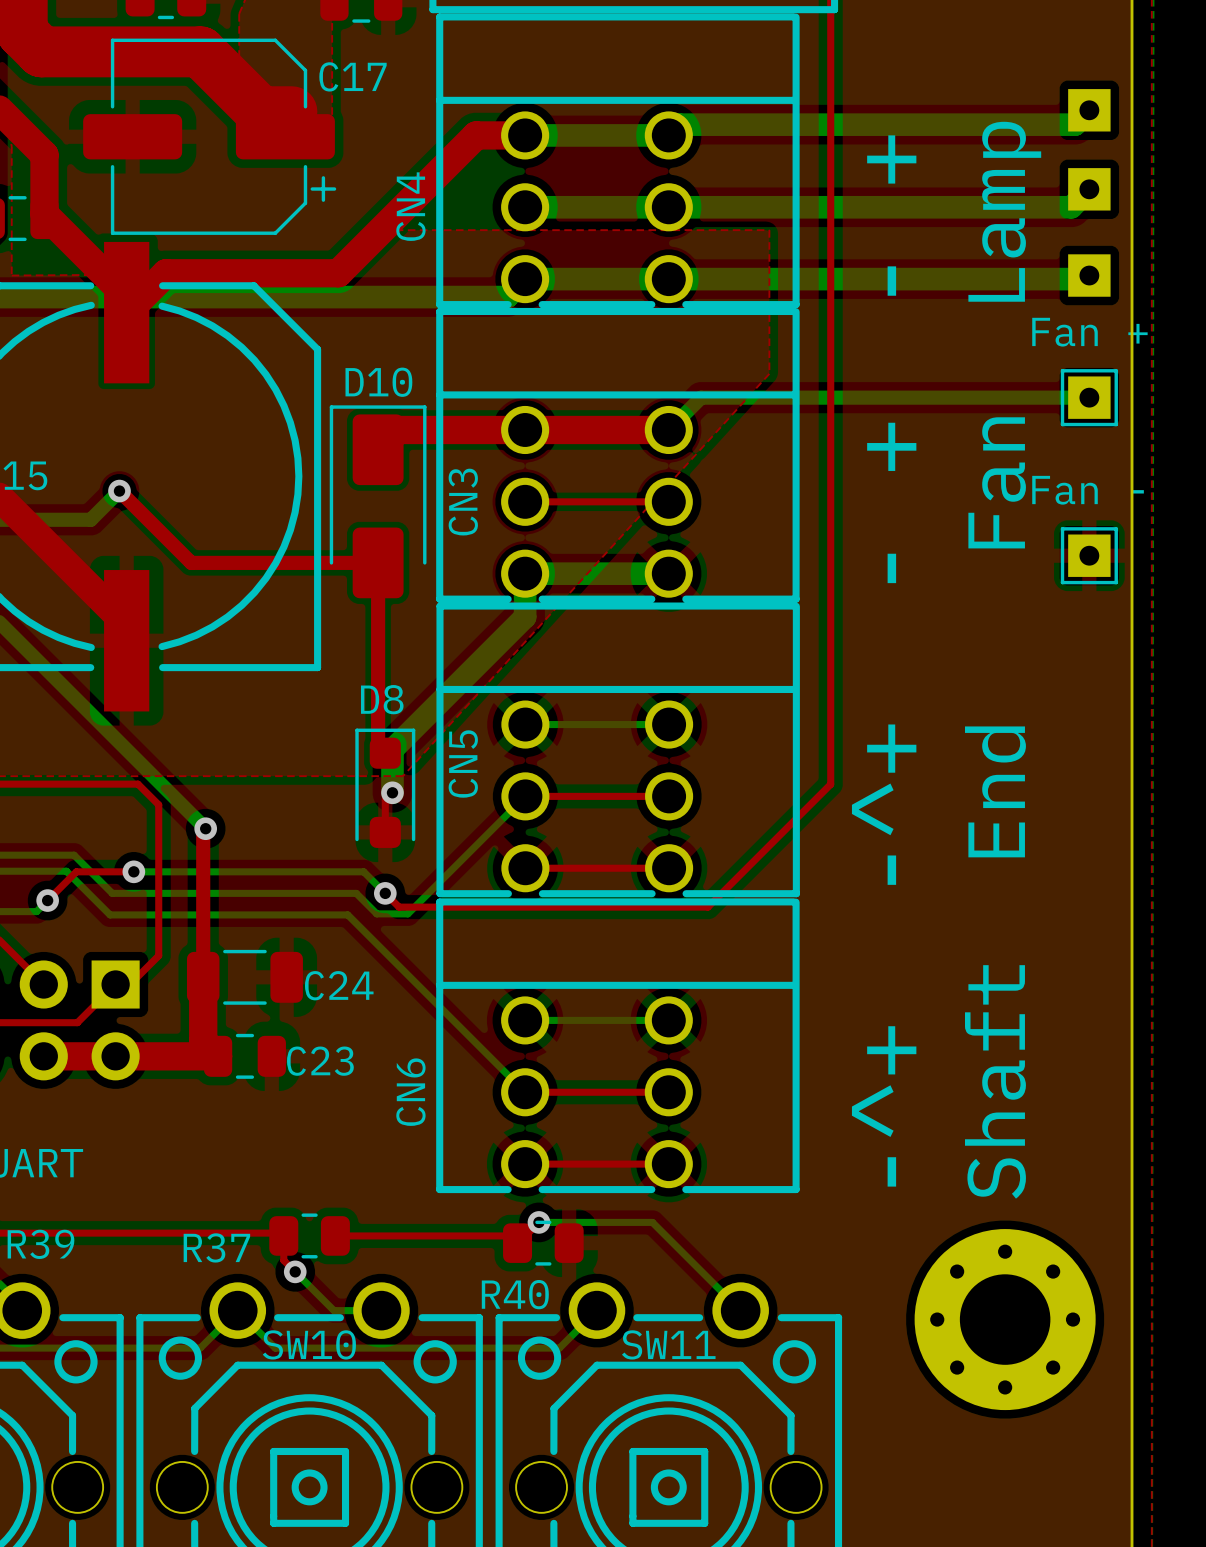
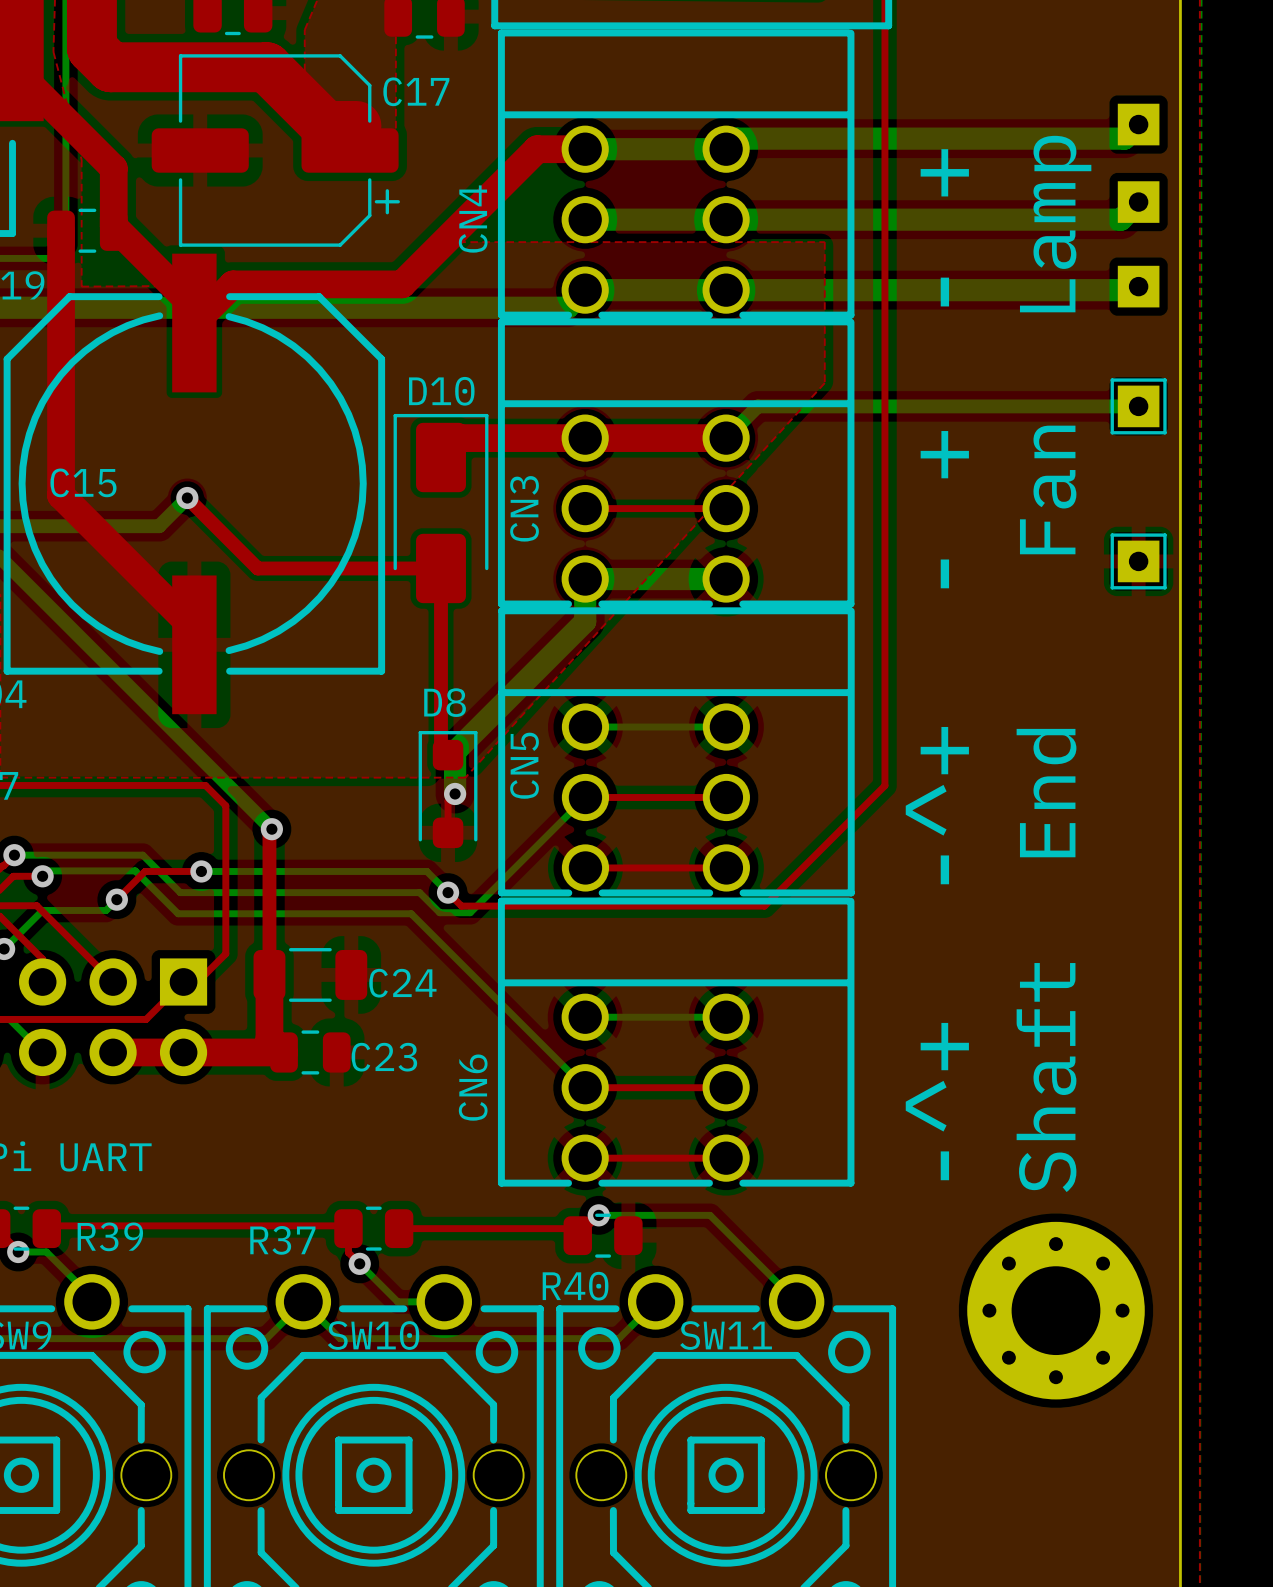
part text: Fan + (1089, 332) -> none
part text: Fan - (1088, 490) -> none

